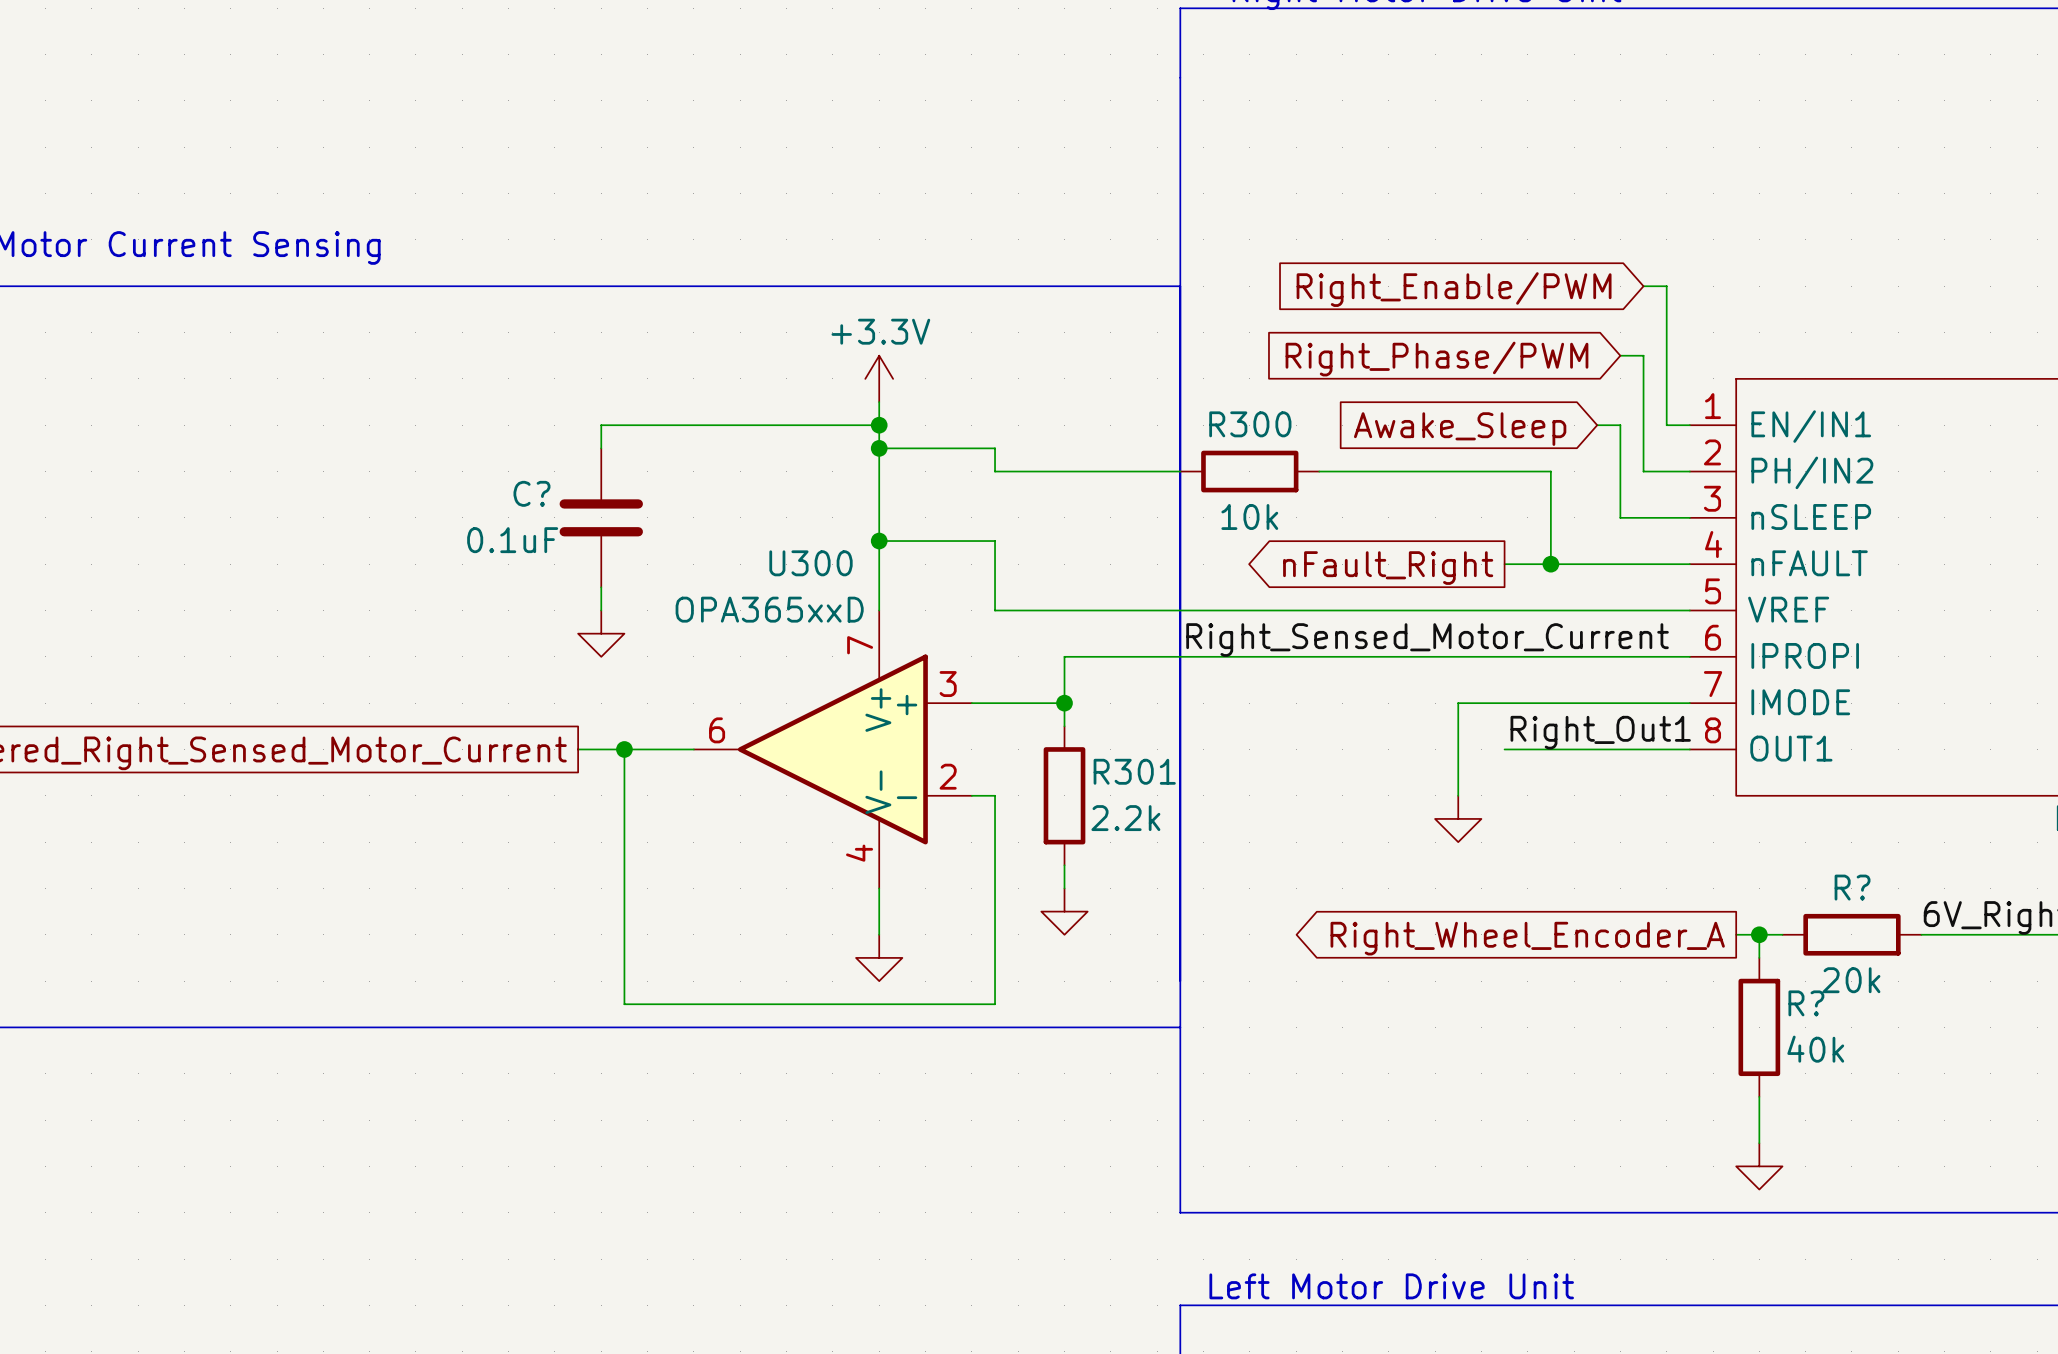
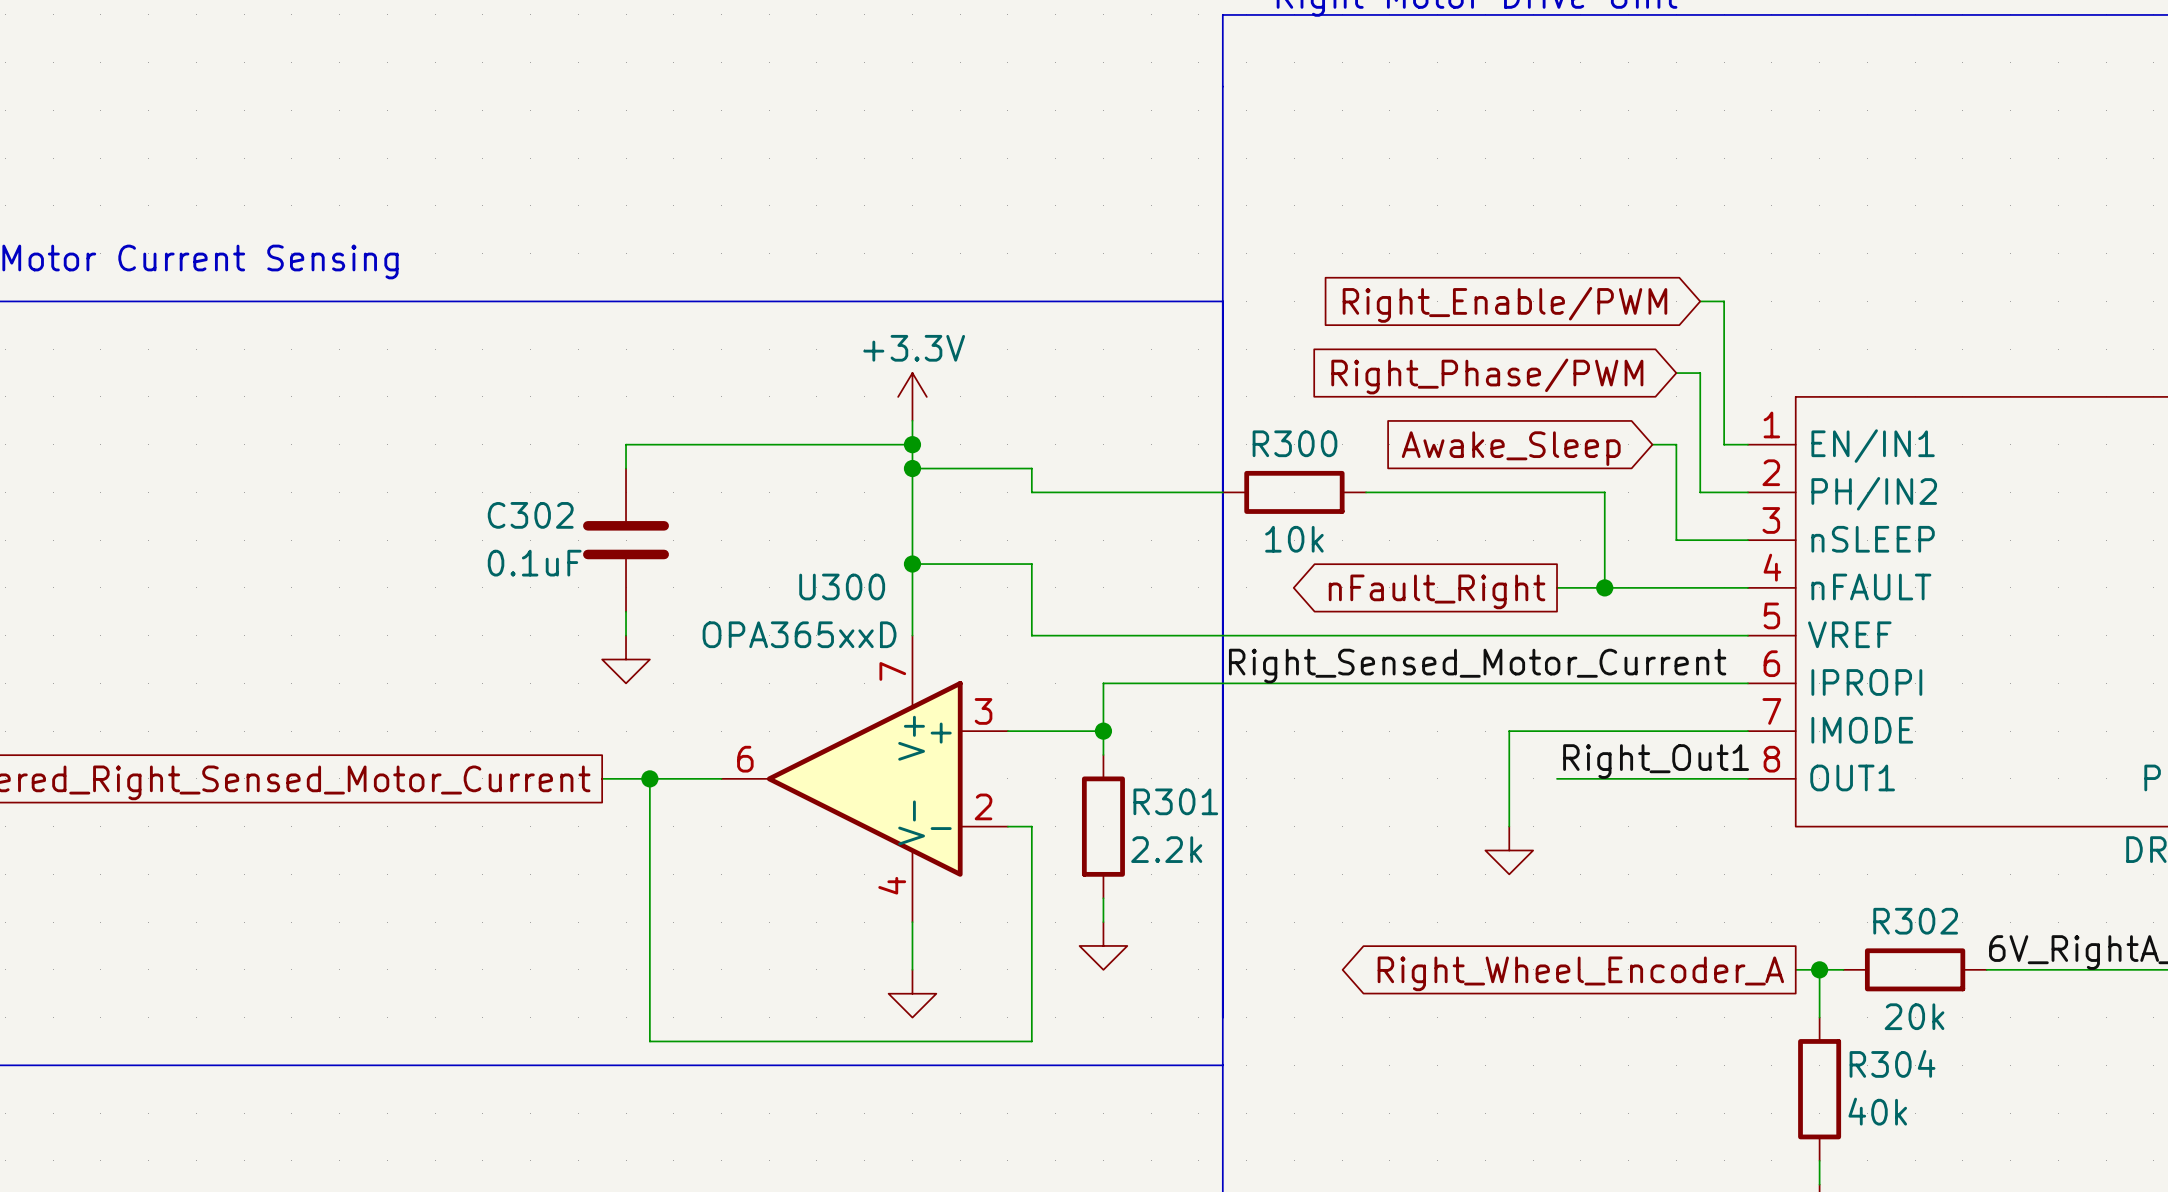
C? name: C? (531, 493) -> C302 (530, 515)
R? name: R? (1852, 887) -> R302 (1915, 921)
R?: 40k (1759, 1027) -> none
R304: none -> 40k (1819, 1089)

